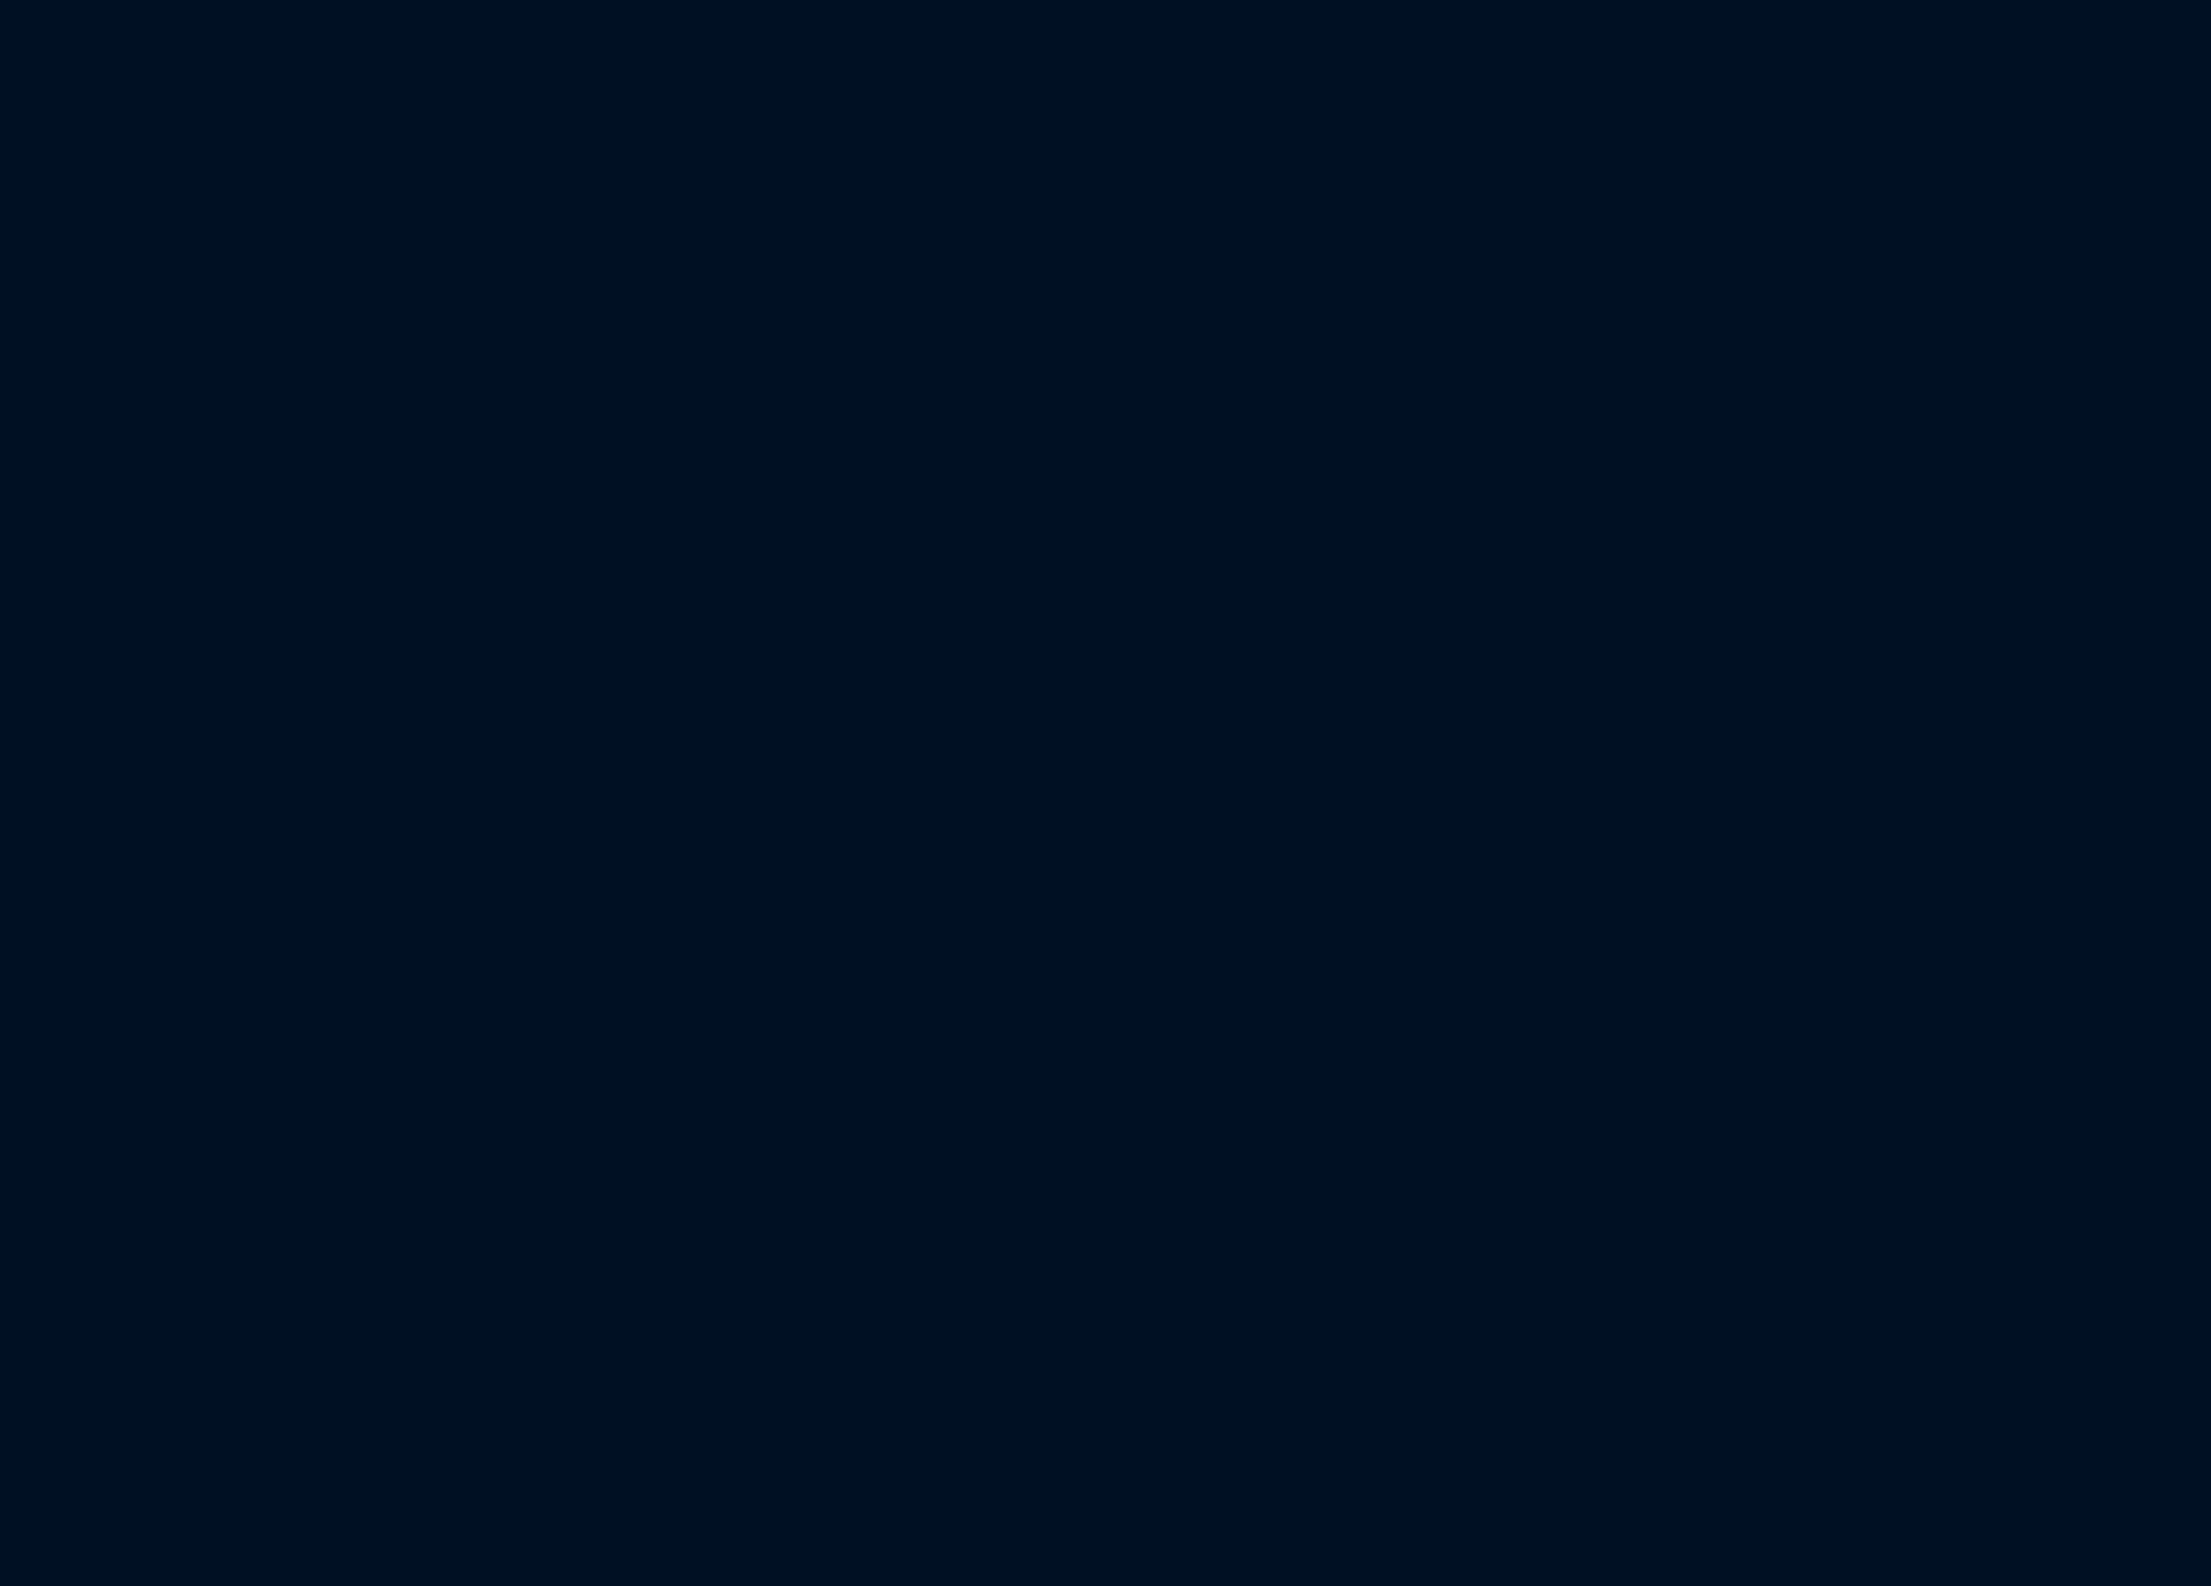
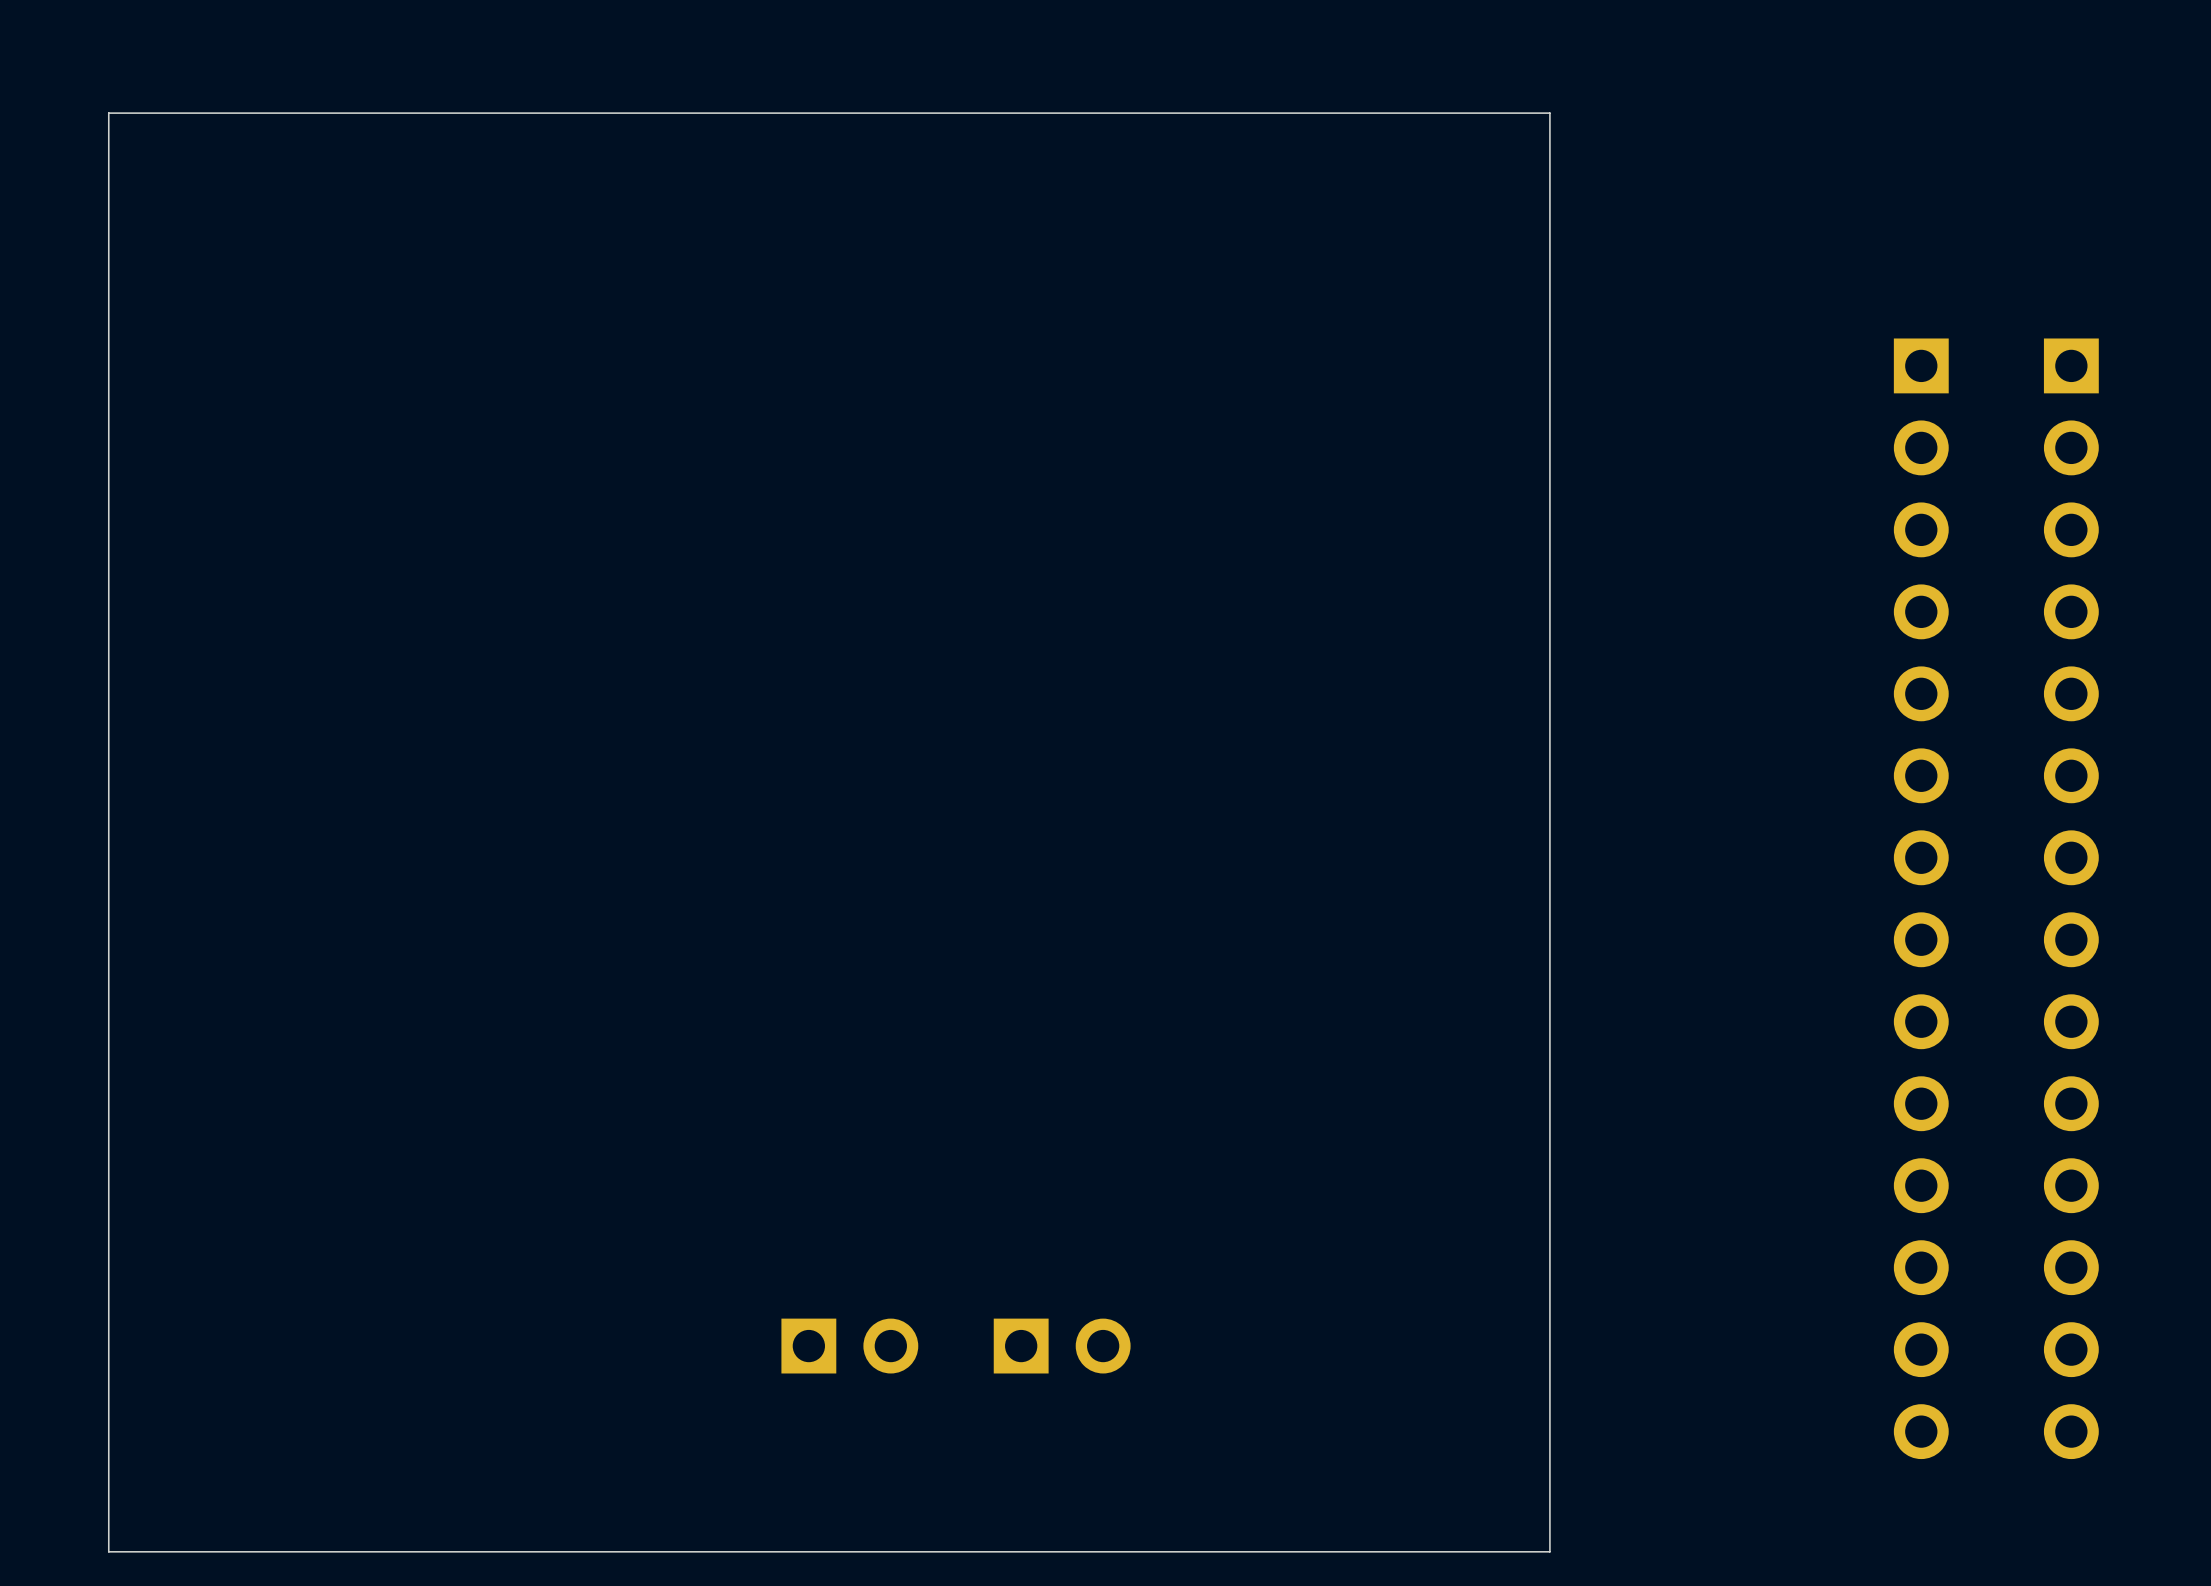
board edge: none -> (1549, 113) (108, 113) (108, 1551) (1549, 1551) (1549, 113)
part: none -> (1921, 898)
part: none -> (2071, 898)
part: none -> (849, 1346)
part: none -> (1062, 1346)

